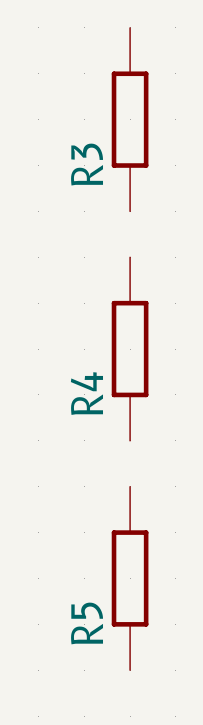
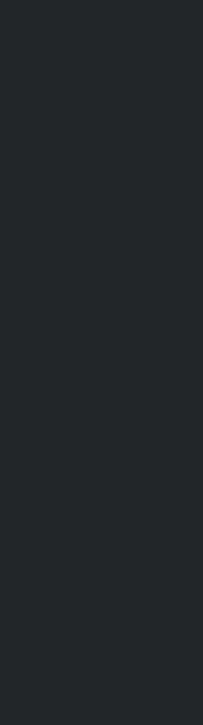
R3: (130, 119) -> none
R4: (130, 349) -> none
R5: (130, 578) -> none

